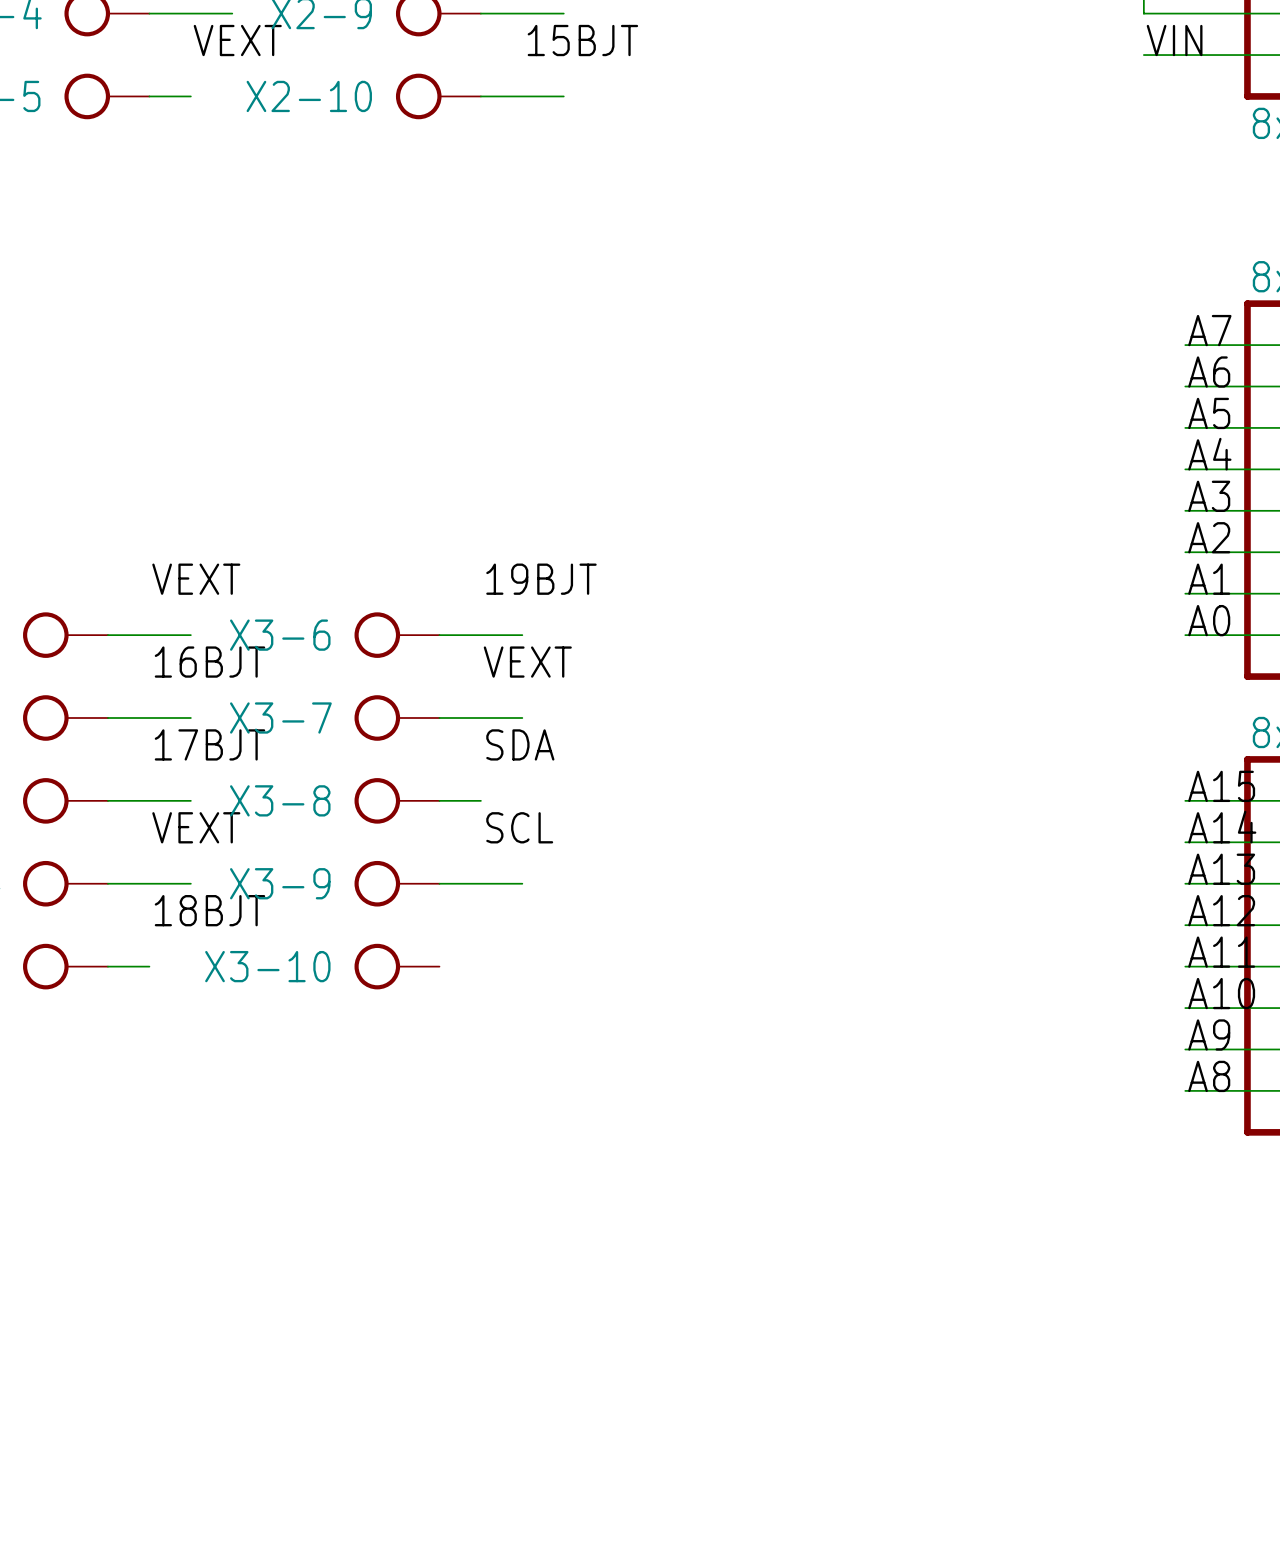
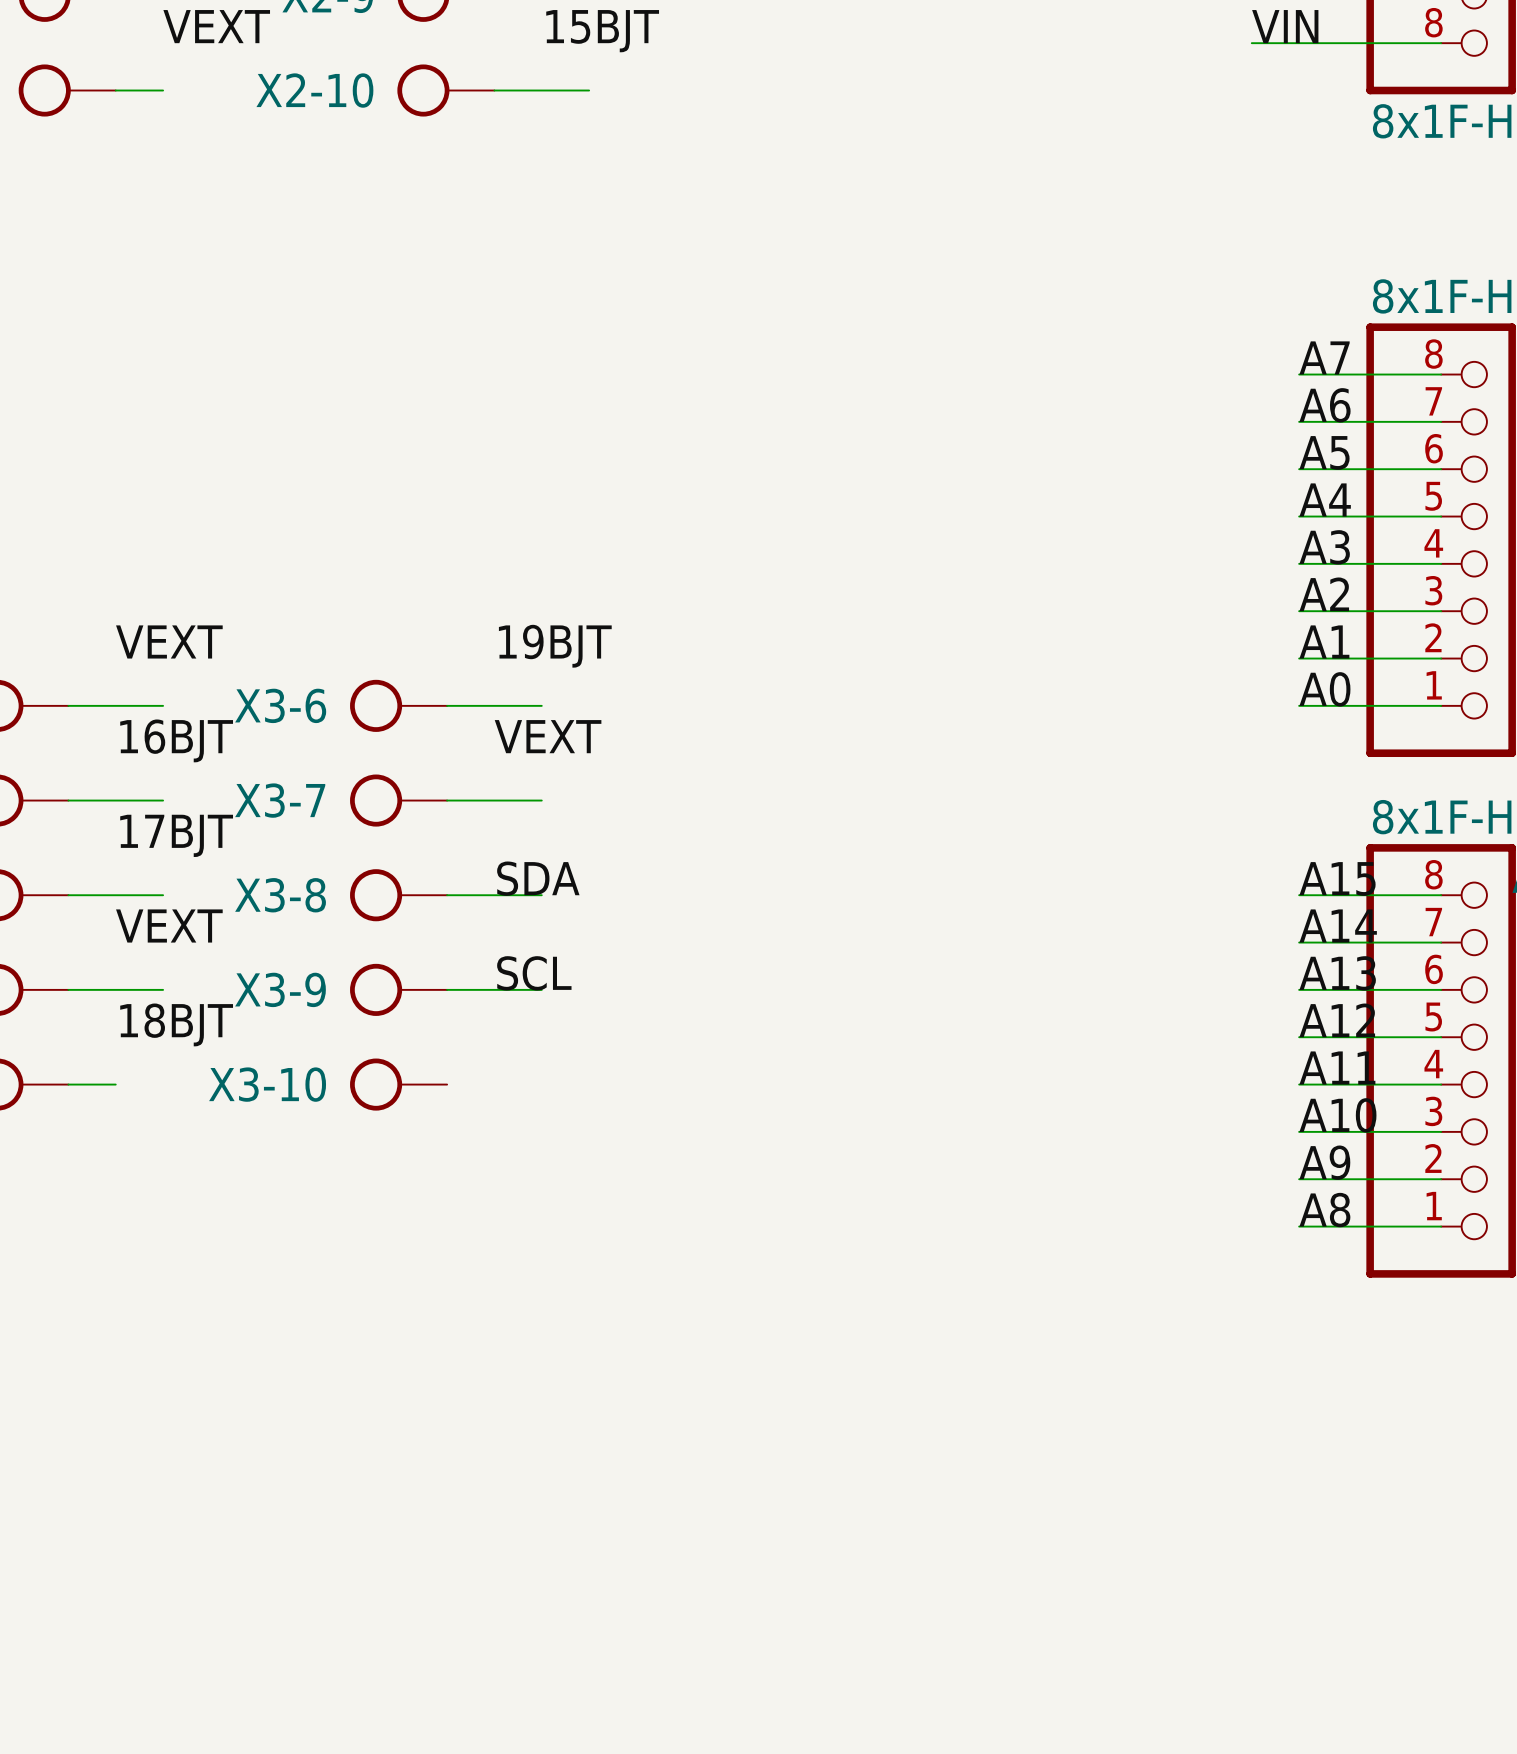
label position: SDA (520, 744) -> SDA (538, 878)
wire: none -> (494, 895) (541, 895)
label position: SCL (519, 827) -> SCL (534, 973)

